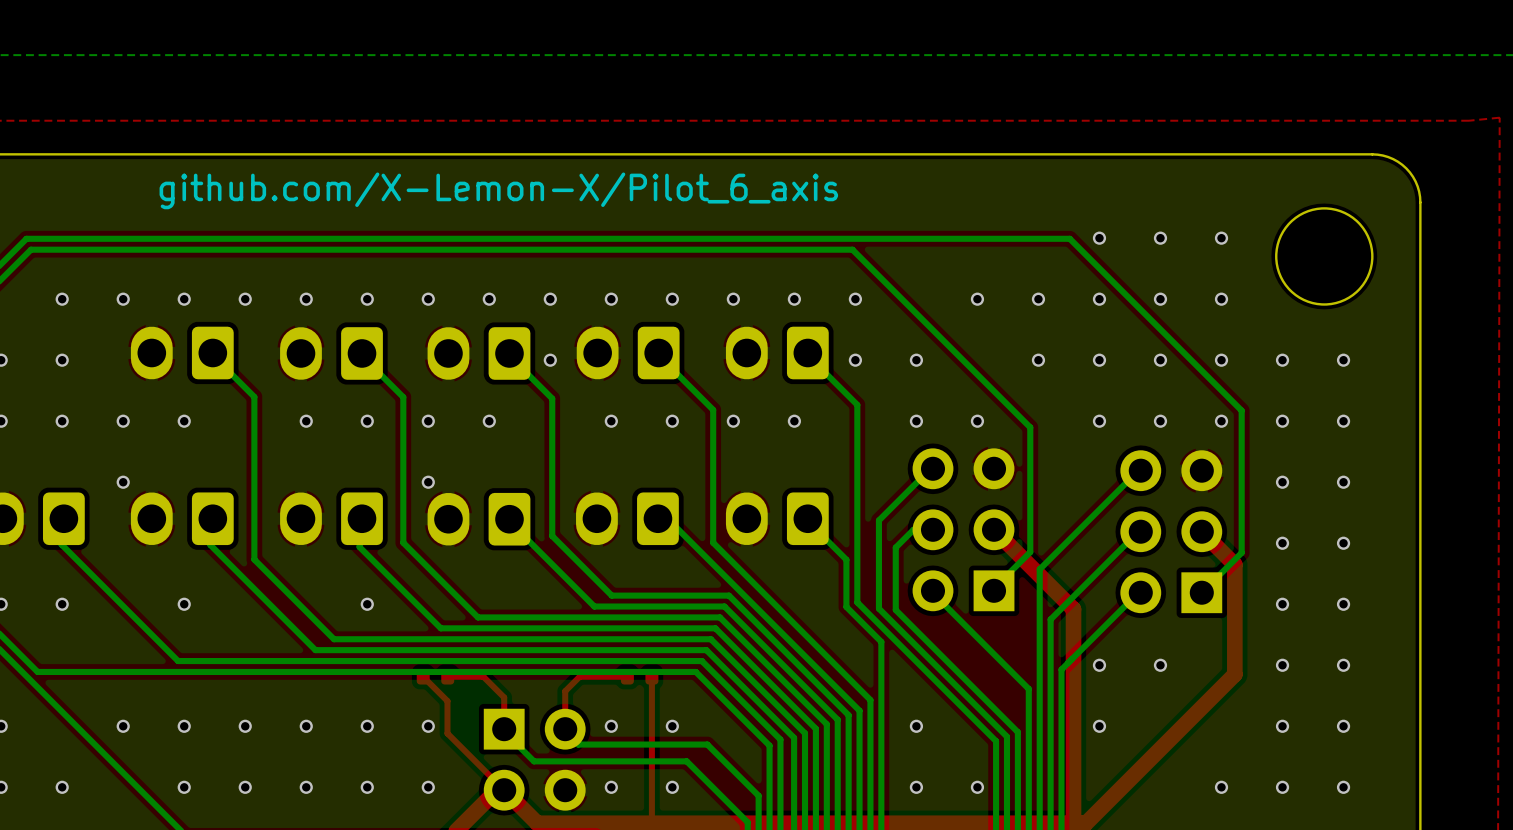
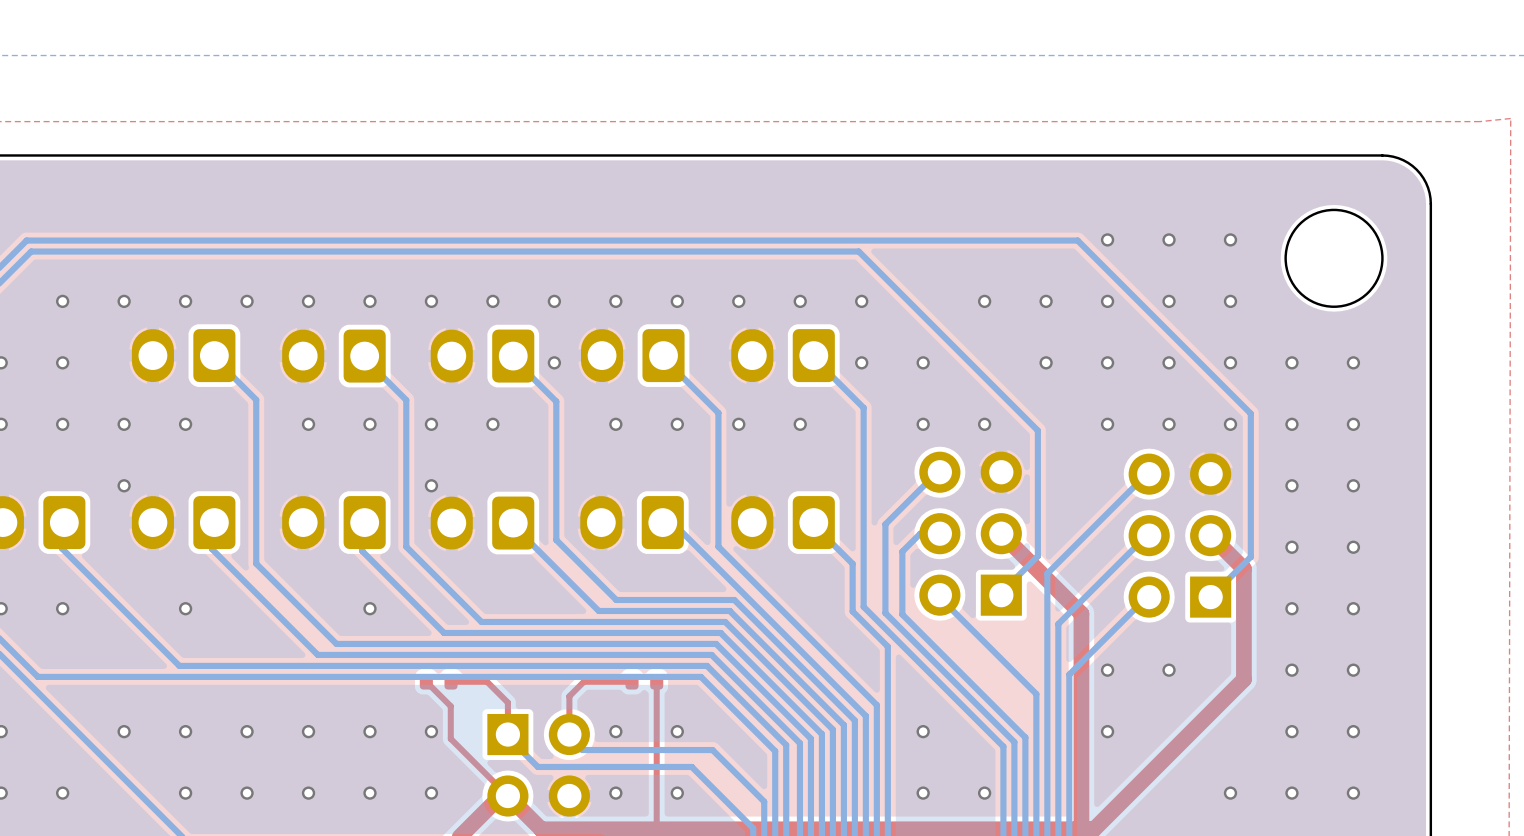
text: github.com/X-Lemon-X/Pilot_6_axis (498, 190) -> none

